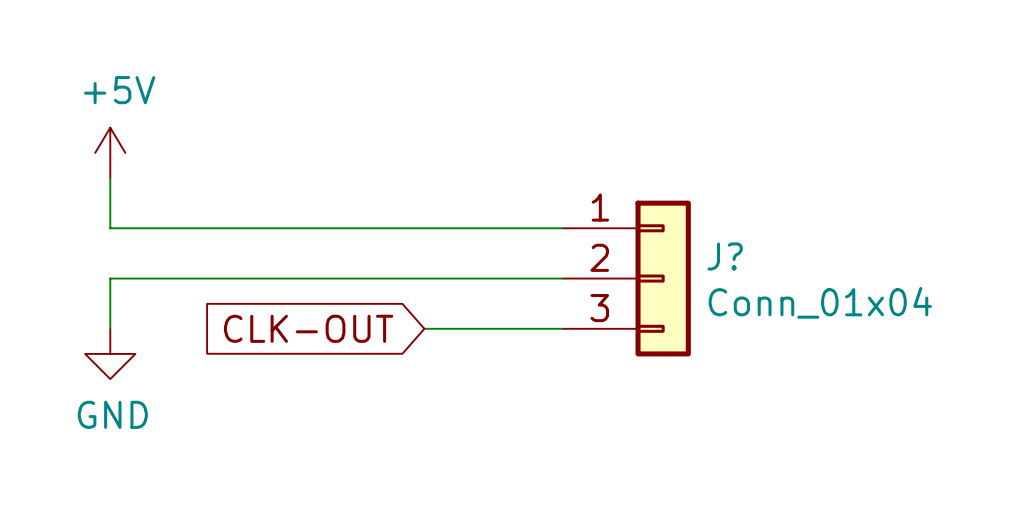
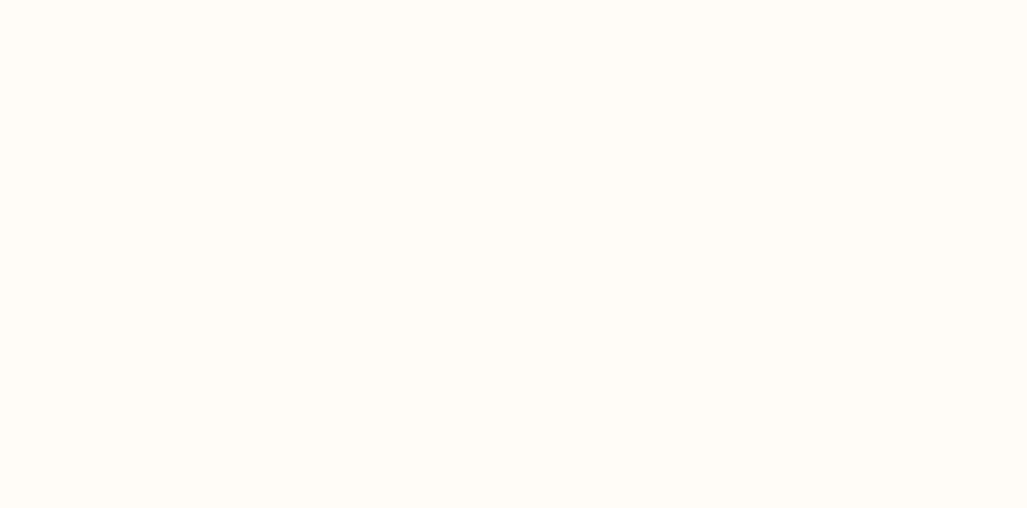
power symbol: +5V (110, 152) -> none
wire: (110, 178) (110, 228) (562, 228) -> none
wire: (562, 278) (110, 278) (110, 328) -> none
J?: Conn_01x04 (626, 278) -> none
global label: CLK-OUT (308, 328) -> none
wire: (424, 328) (562, 328) -> none
power symbol: GND (110, 353) -> none

